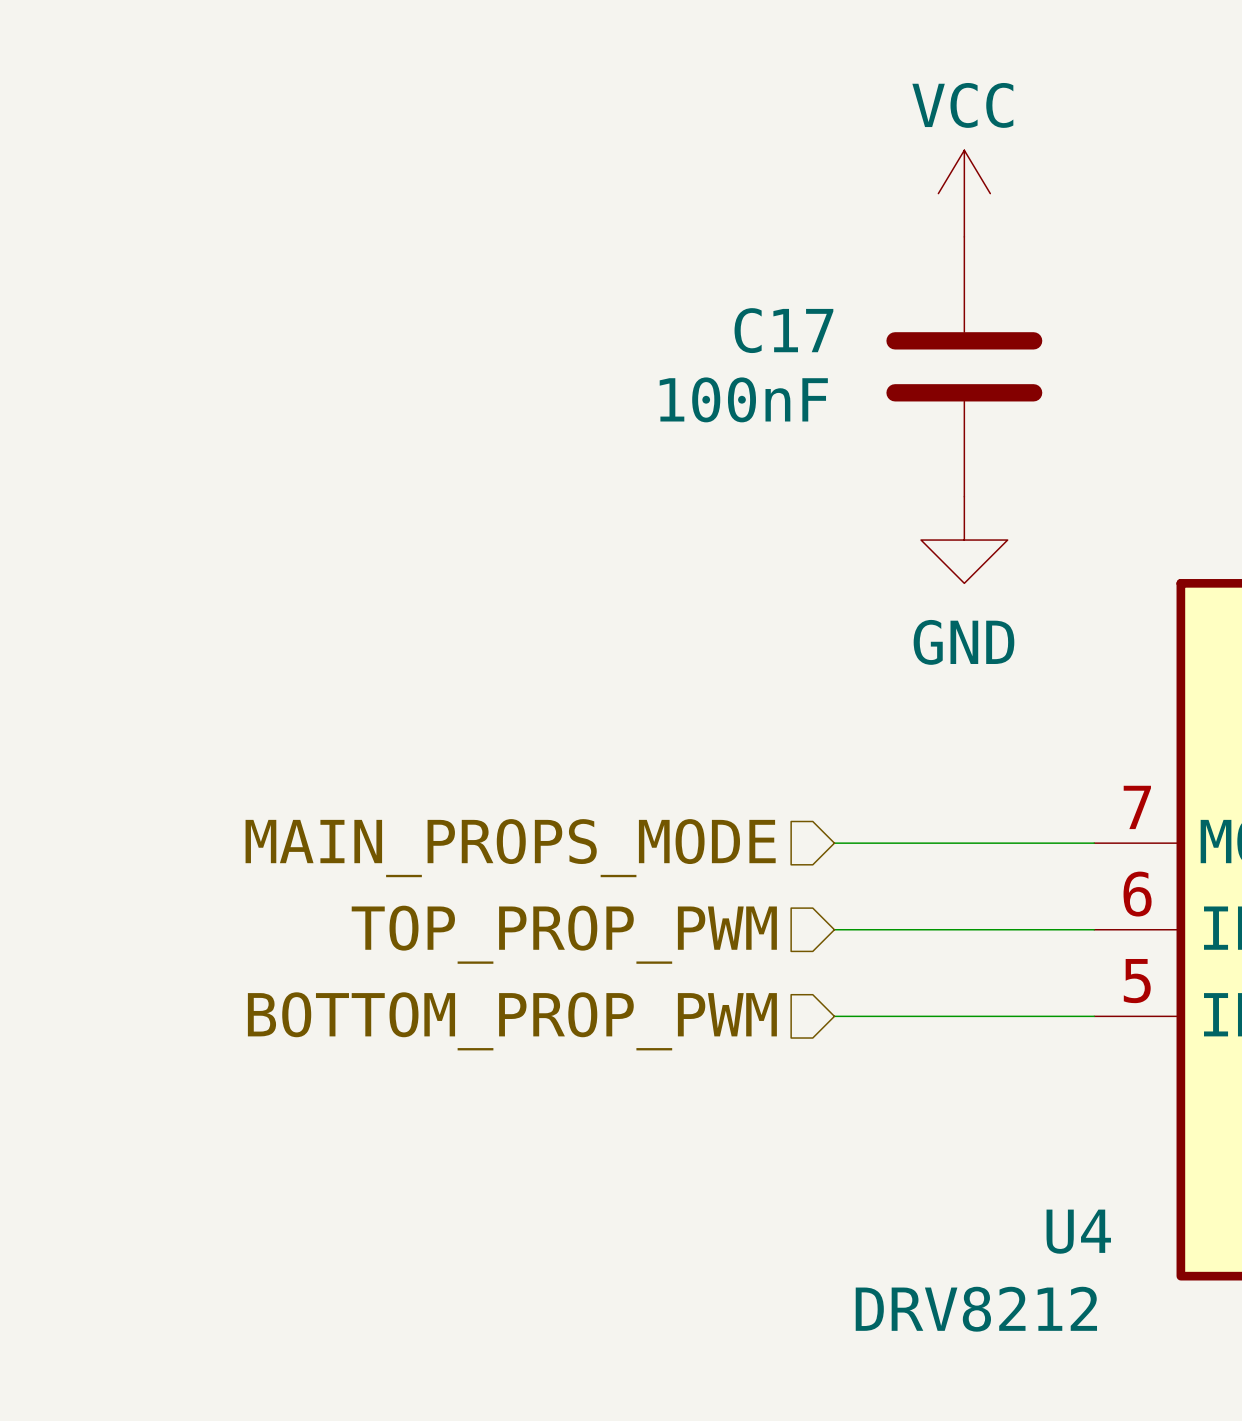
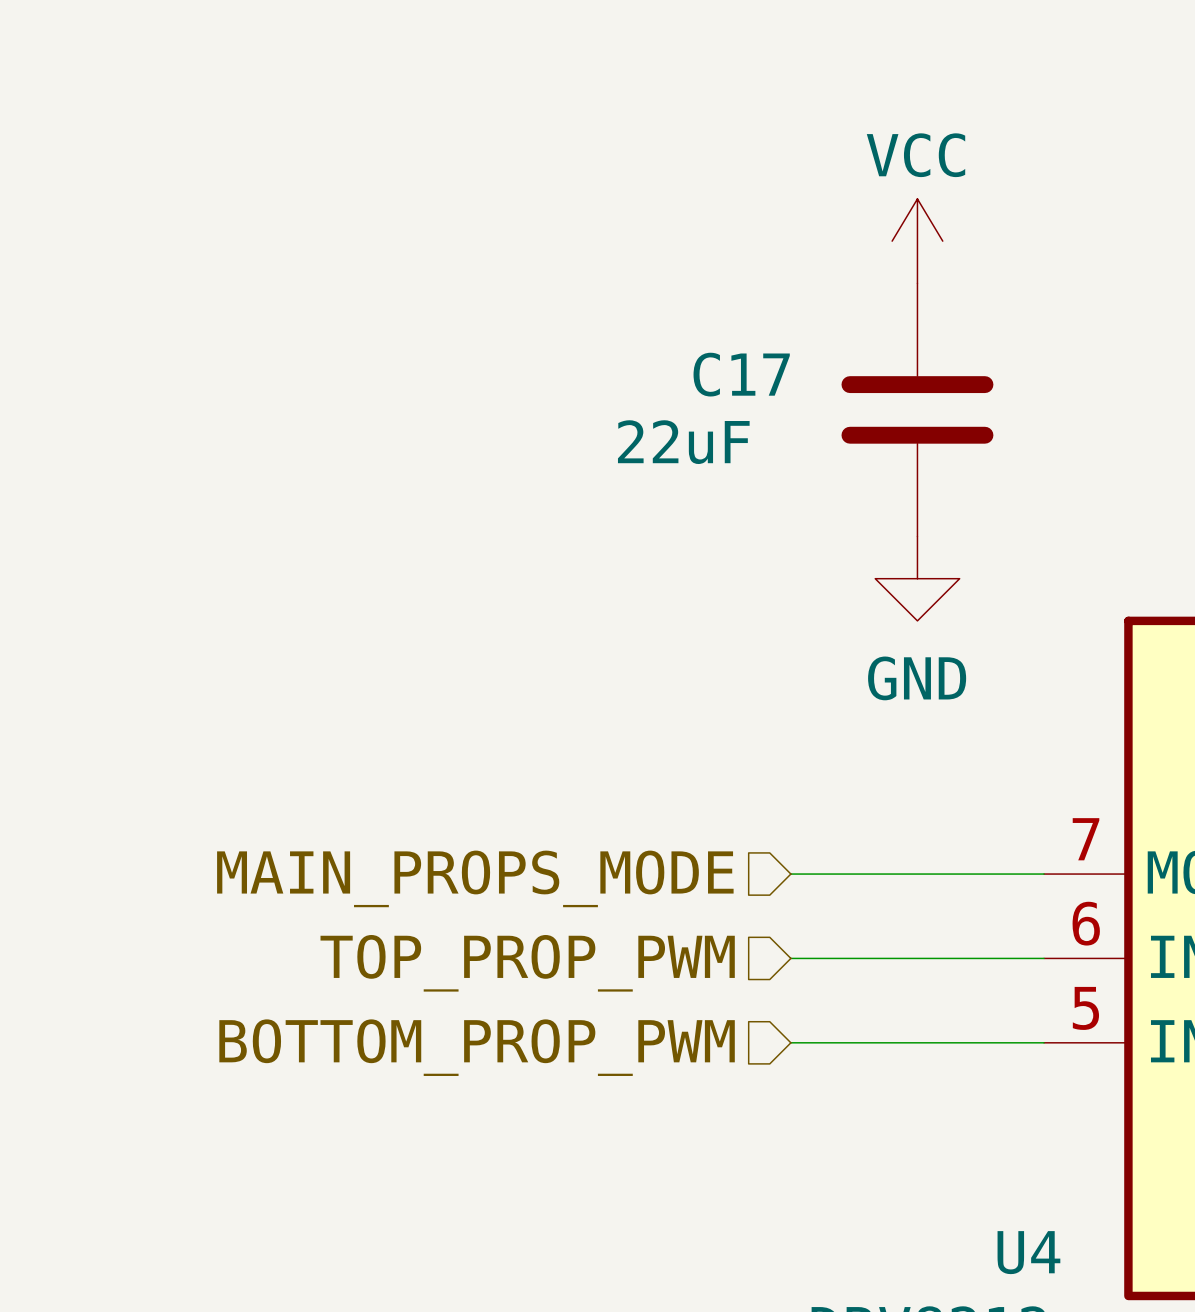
C17 value: 100nF (743, 399) -> 22uF (683, 442)

